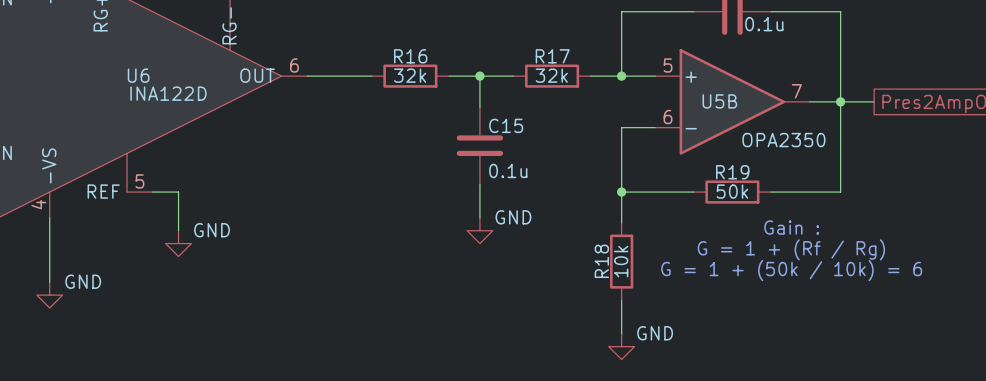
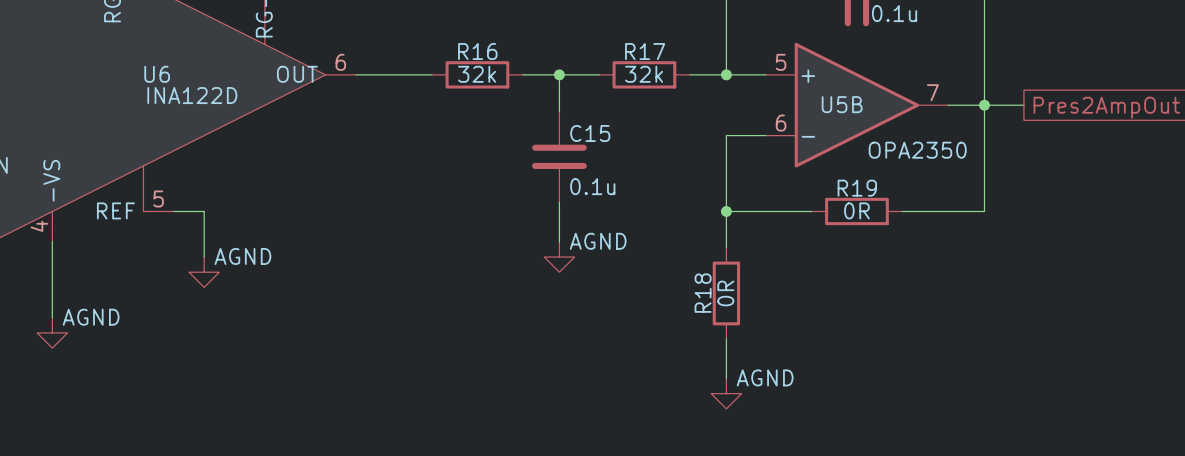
R19 value: 50k (732, 191) -> 0R (856, 210)
text: Gain : (791, 227) -> none
power symbol: GND (479, 230) -> AGND (559, 257)
power symbol: GND (178, 243) -> AGND (204, 272)
text: G = 1 + (Rf / Rg) (791, 249) -> none
R18 value: 10k (621, 261) -> 0R (725, 293)
text: G = 1 + (50k / 10k) = 6 (791, 270) -> none
power symbol: GND (49, 295) -> AGND (52, 332)
power symbol: GND (621, 346) -> AGND (726, 393)

